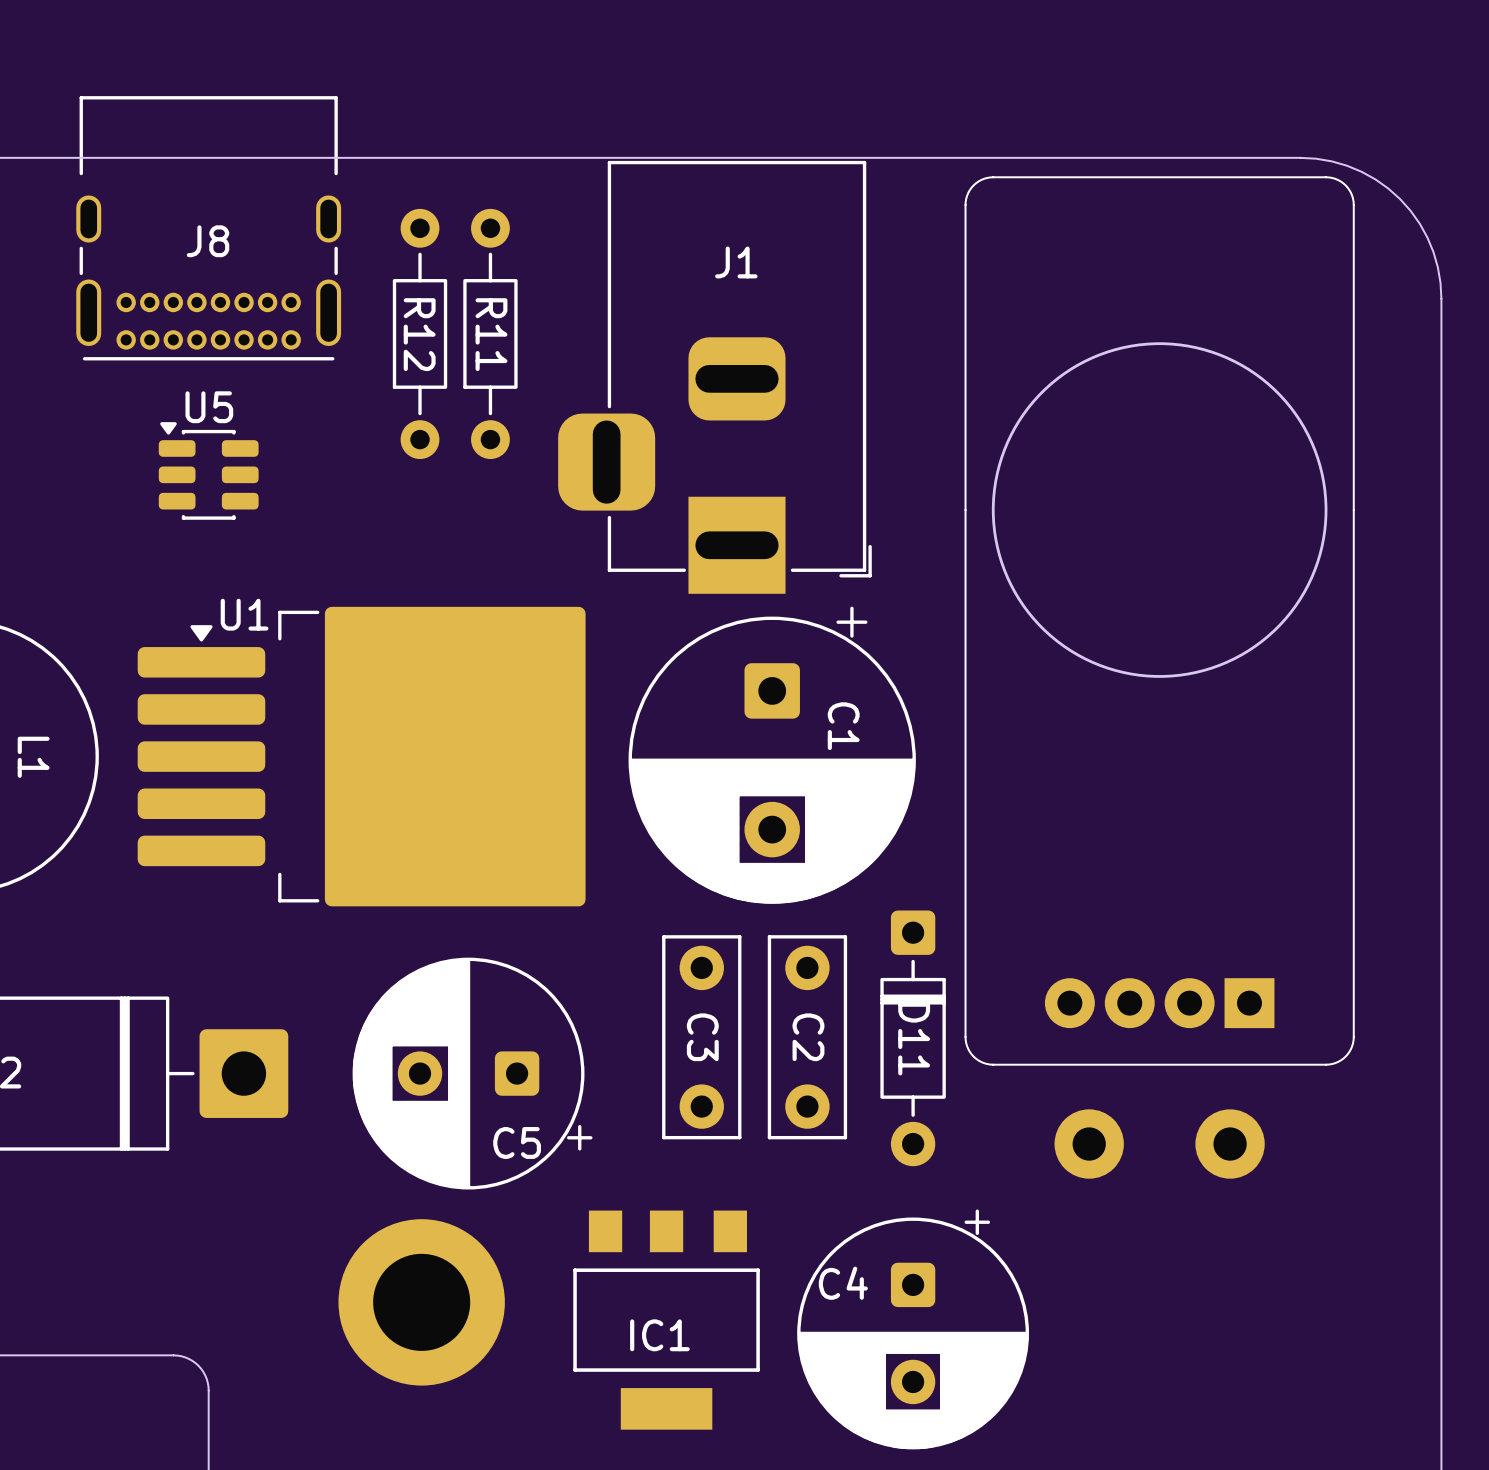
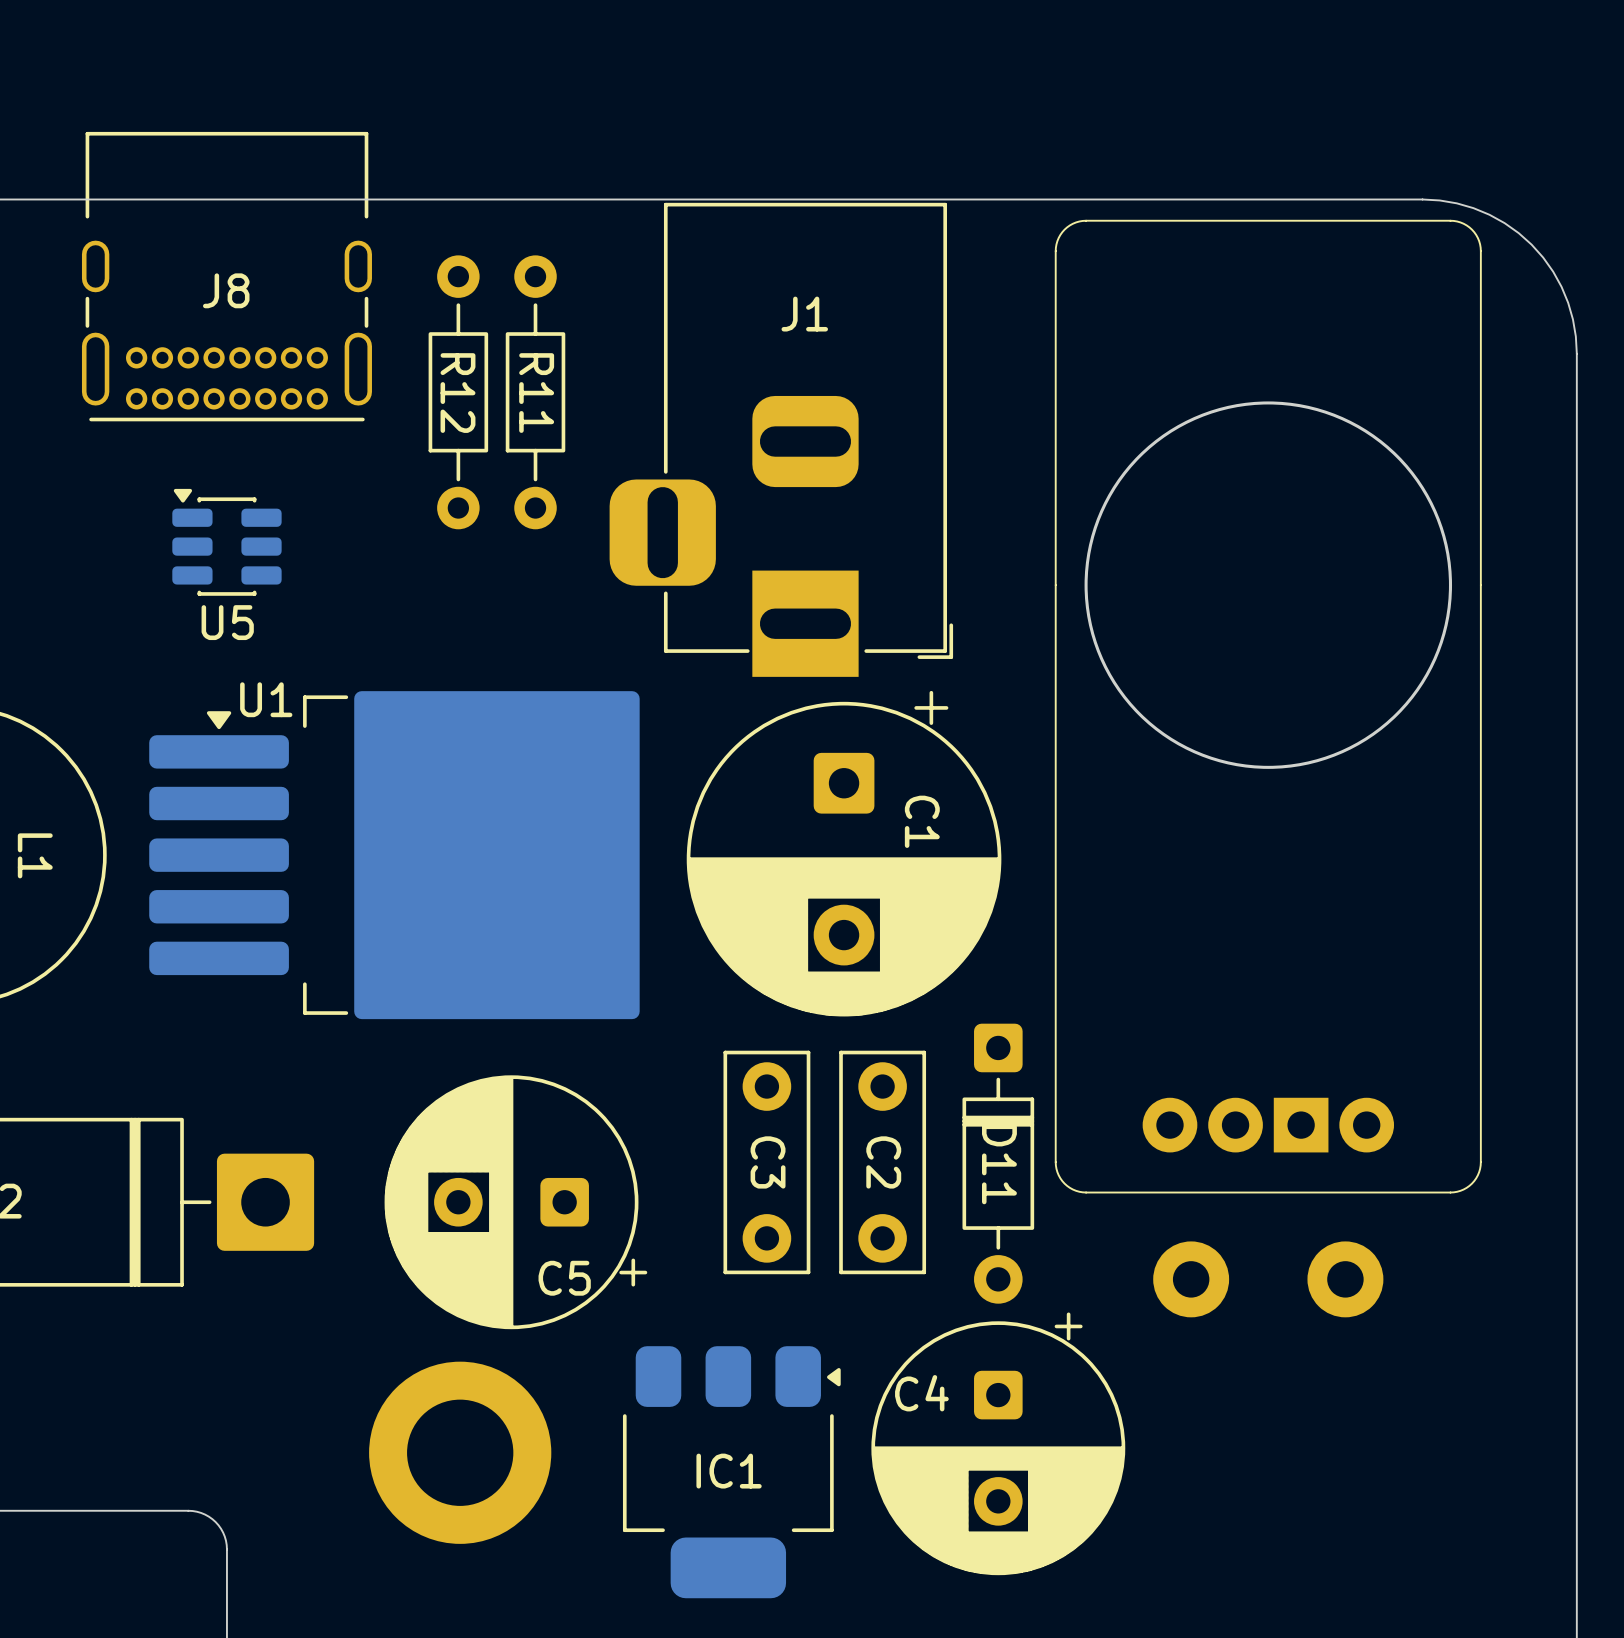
U5 name position: U5 (209, 407) -> U5 (227, 622)
part footprint: [1044, 978, 1275, 1029] -> [1142, 1097, 1395, 1153]
IC1 footprint: [573, 1210, 760, 1430] -> [622, 1346, 841, 1599]
C4 position: (913, 1329) -> (998, 1443)

